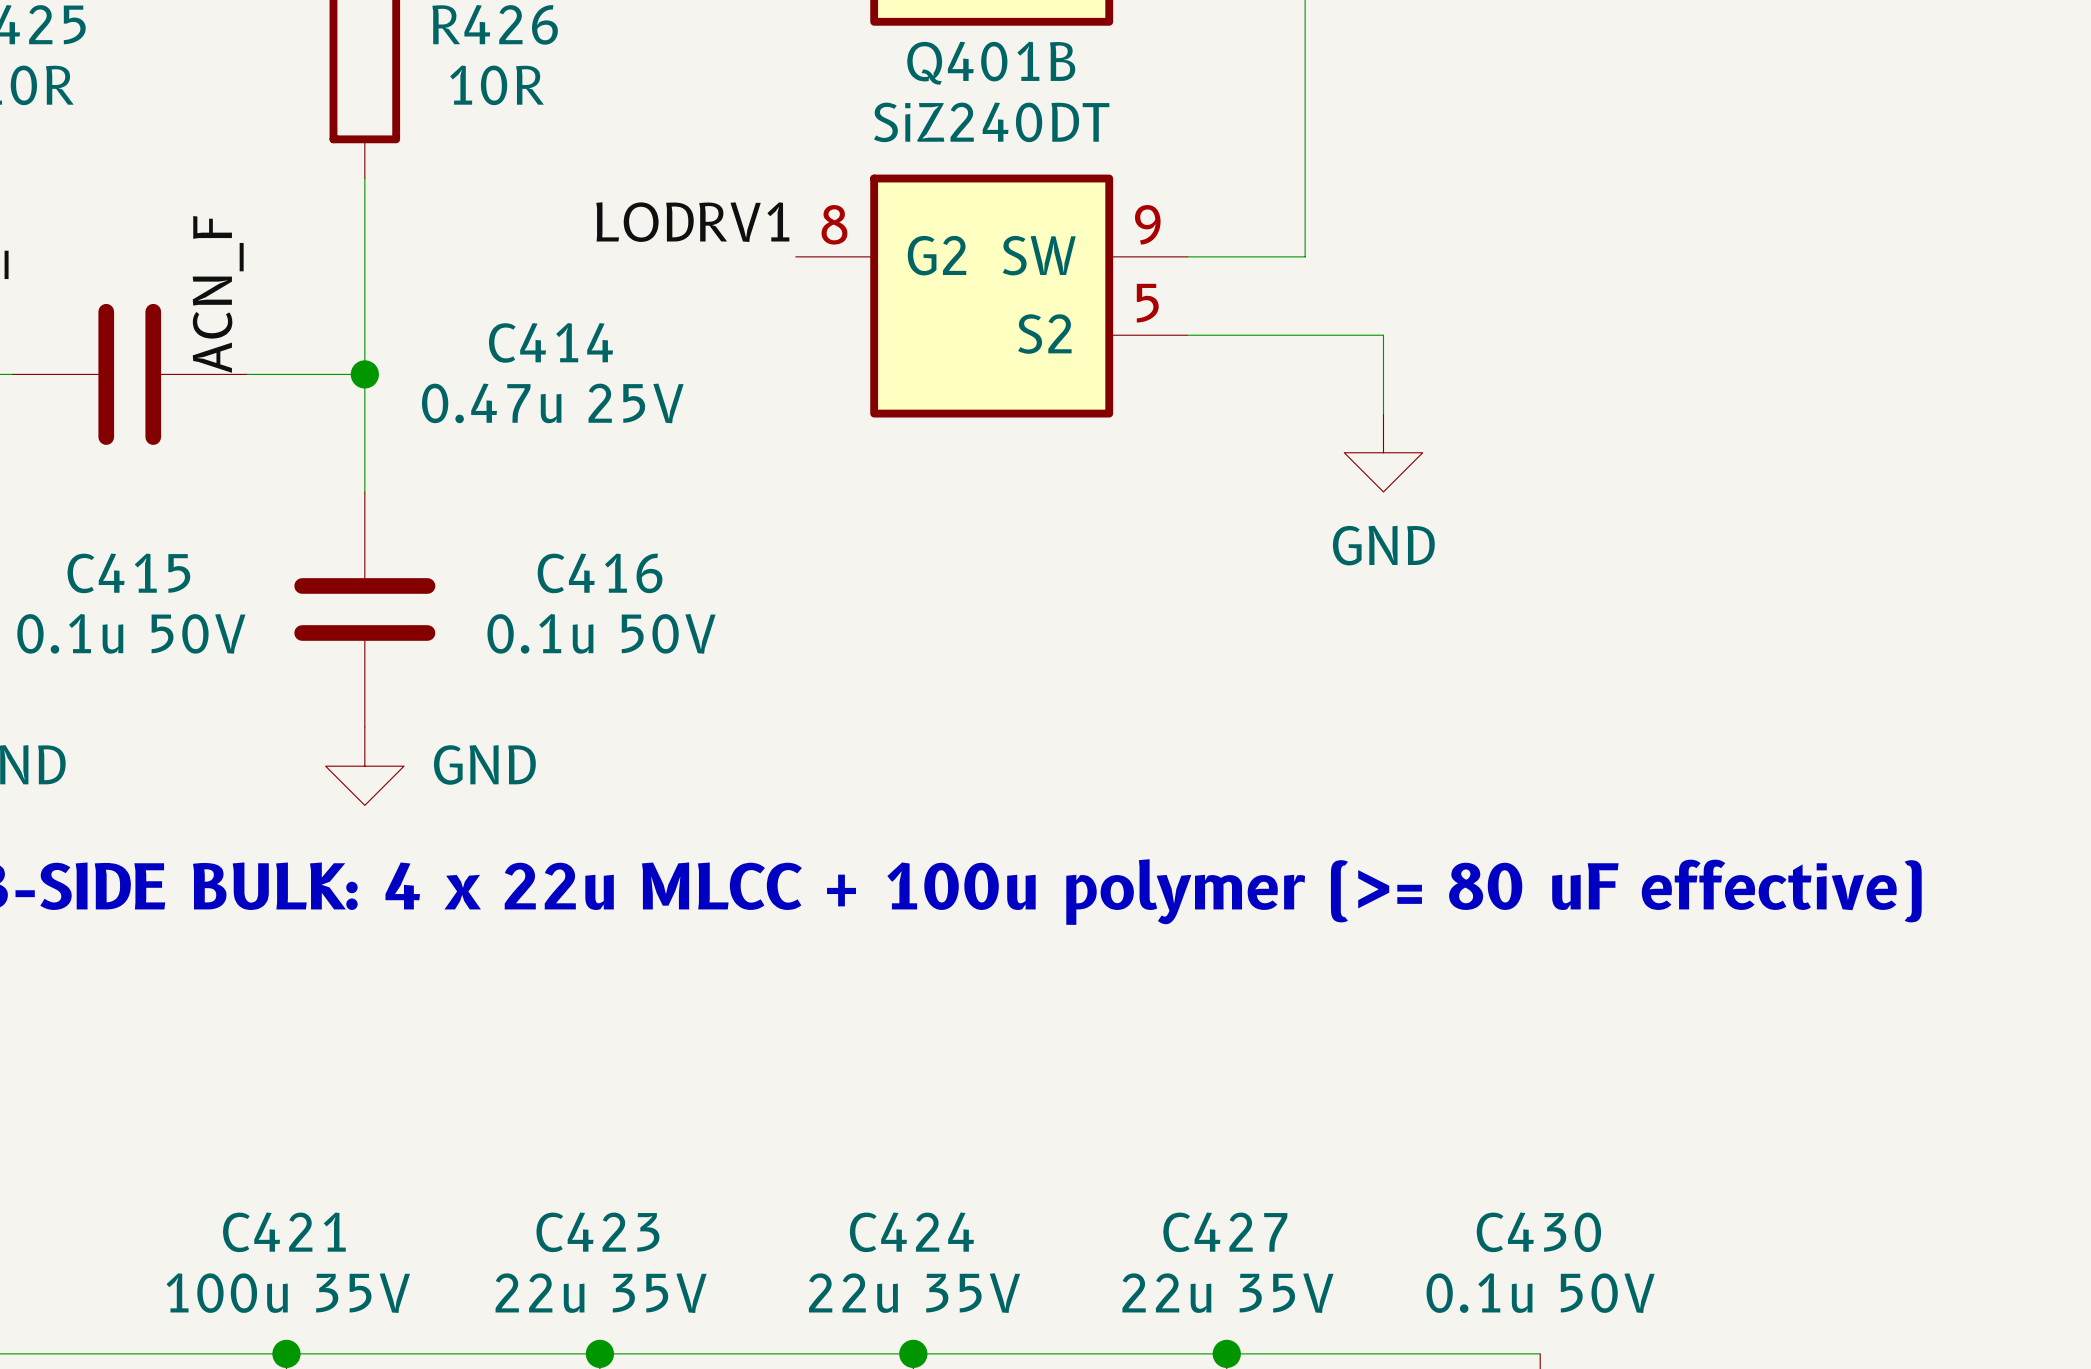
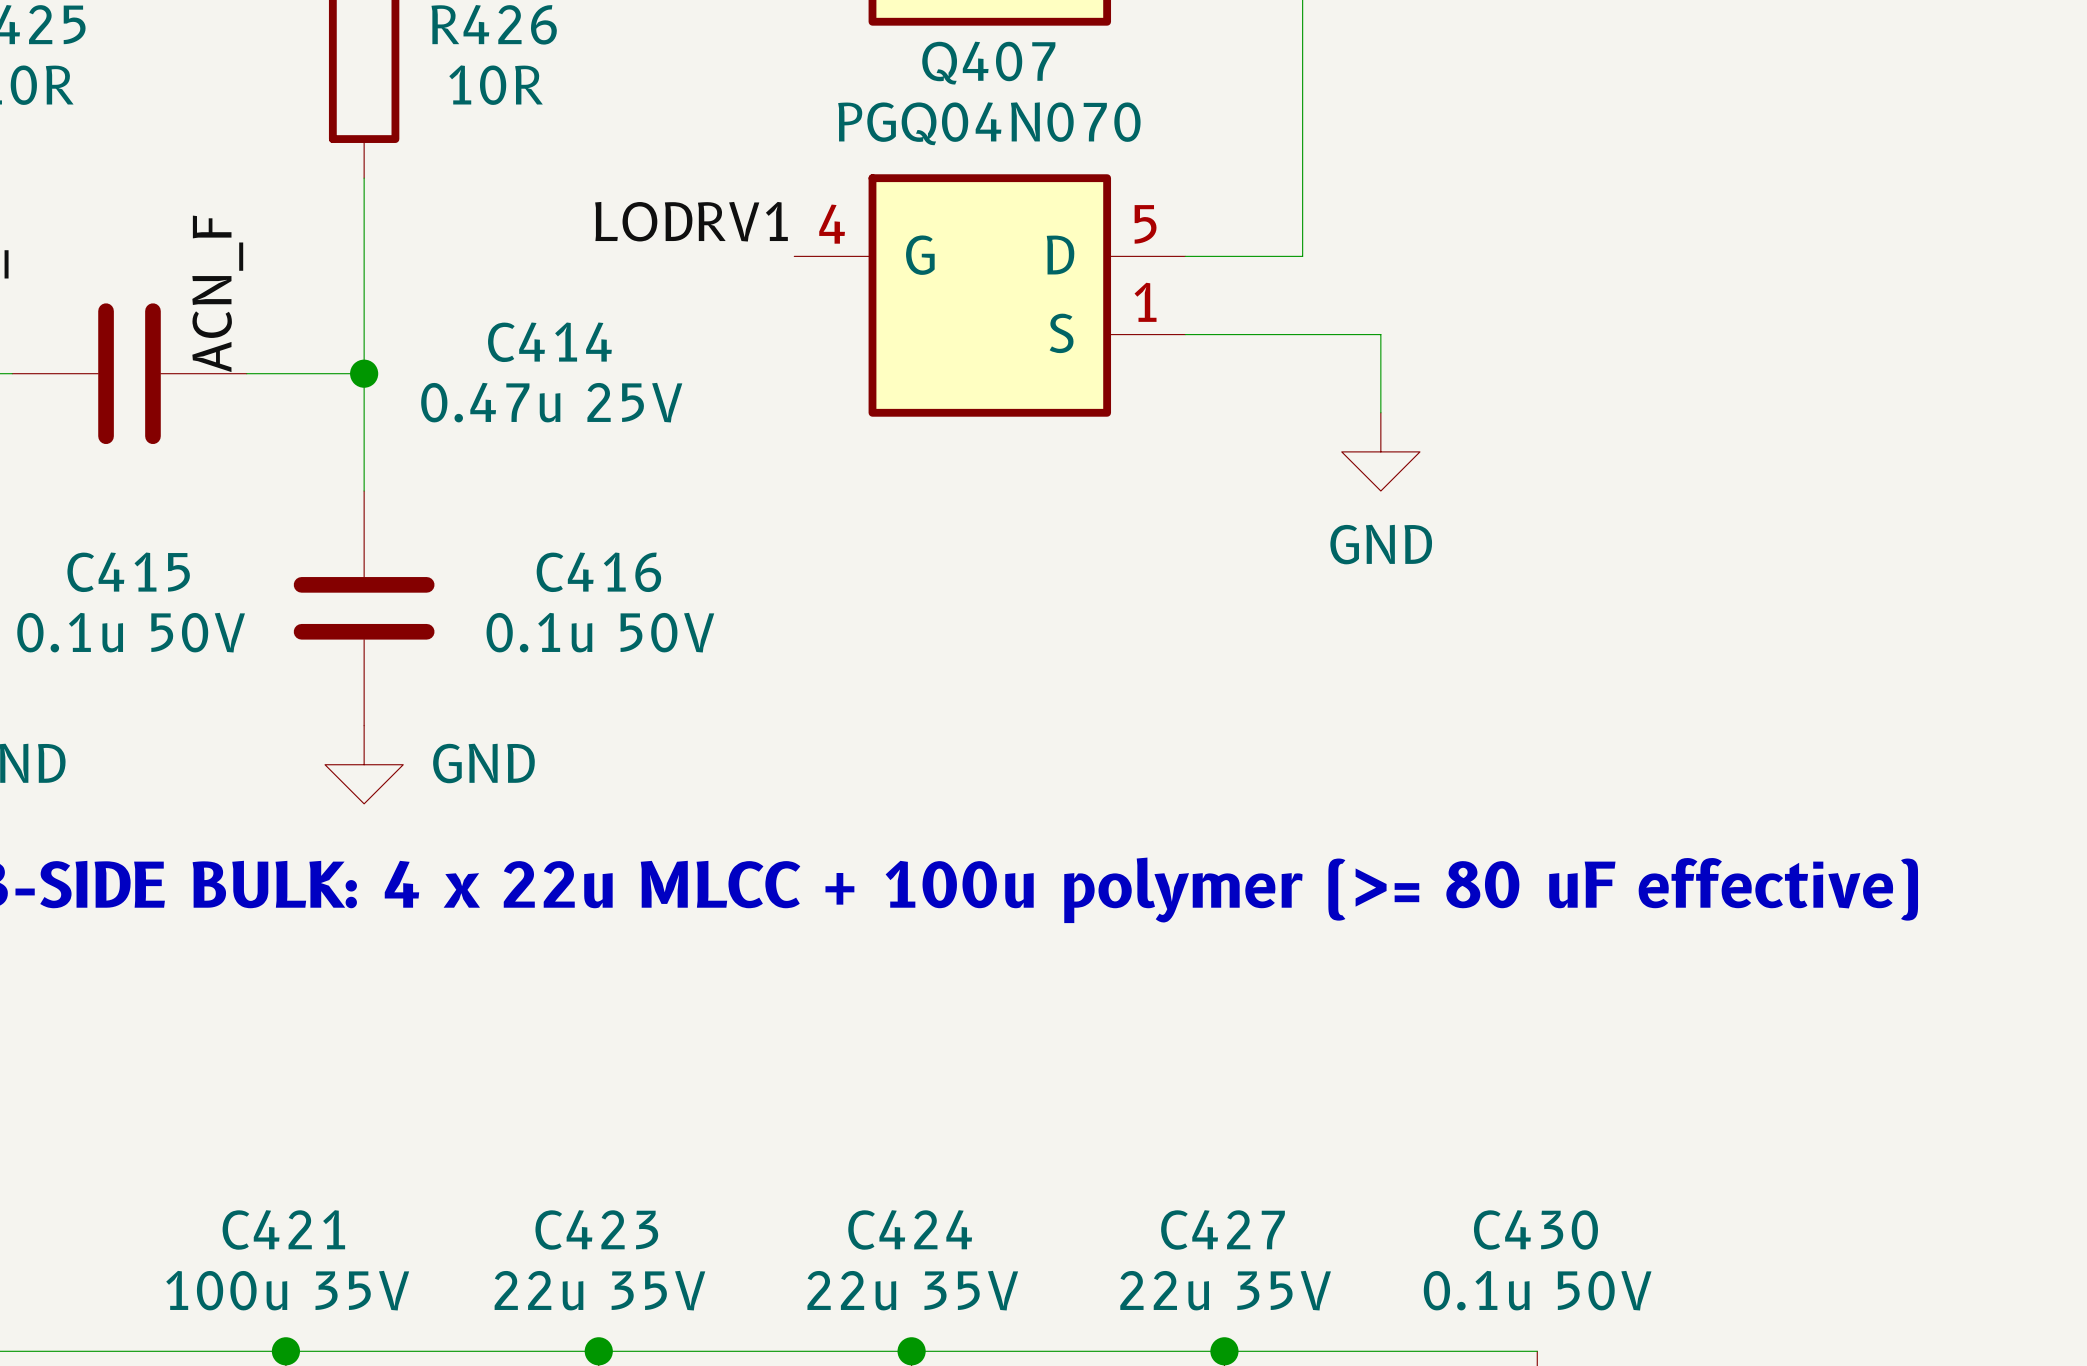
Q401B name: Q401B (991, 63) -> Q407 (988, 63)
Q401B value: SiZ240DT (991, 122) -> PGQ04N070 (989, 123)
Q401B pin number: 8 (834, 224) -> 4 (832, 224)
Q401B pin number: 9 (1147, 224) -> 5 (1145, 224)
Q401B pin name: G2 (937, 255) -> G (920, 255)
Q401B pin name: SW (1039, 255) -> D (1060, 255)
Q401B pin number: 5 (1147, 303) -> 1 (1145, 302)
Q401B pin name: S2 (1044, 334) -> S (1061, 333)

